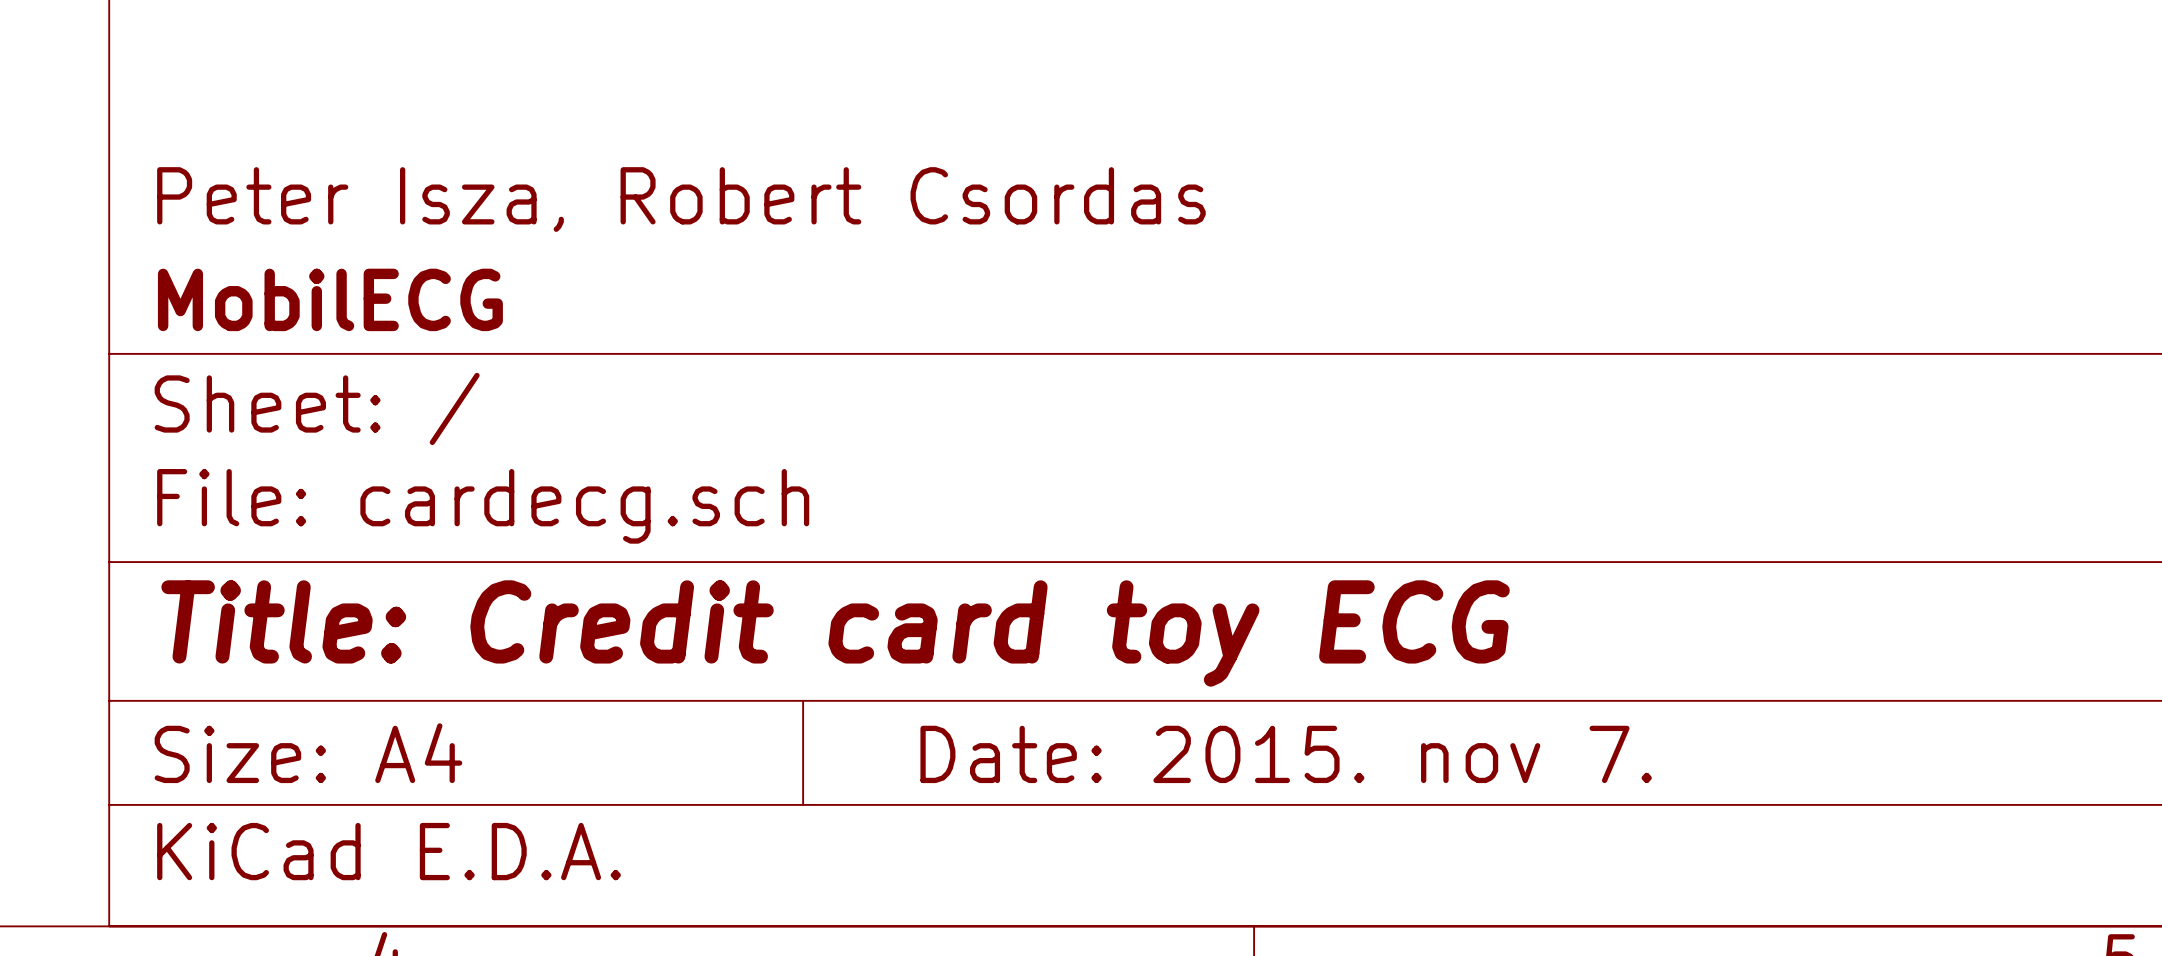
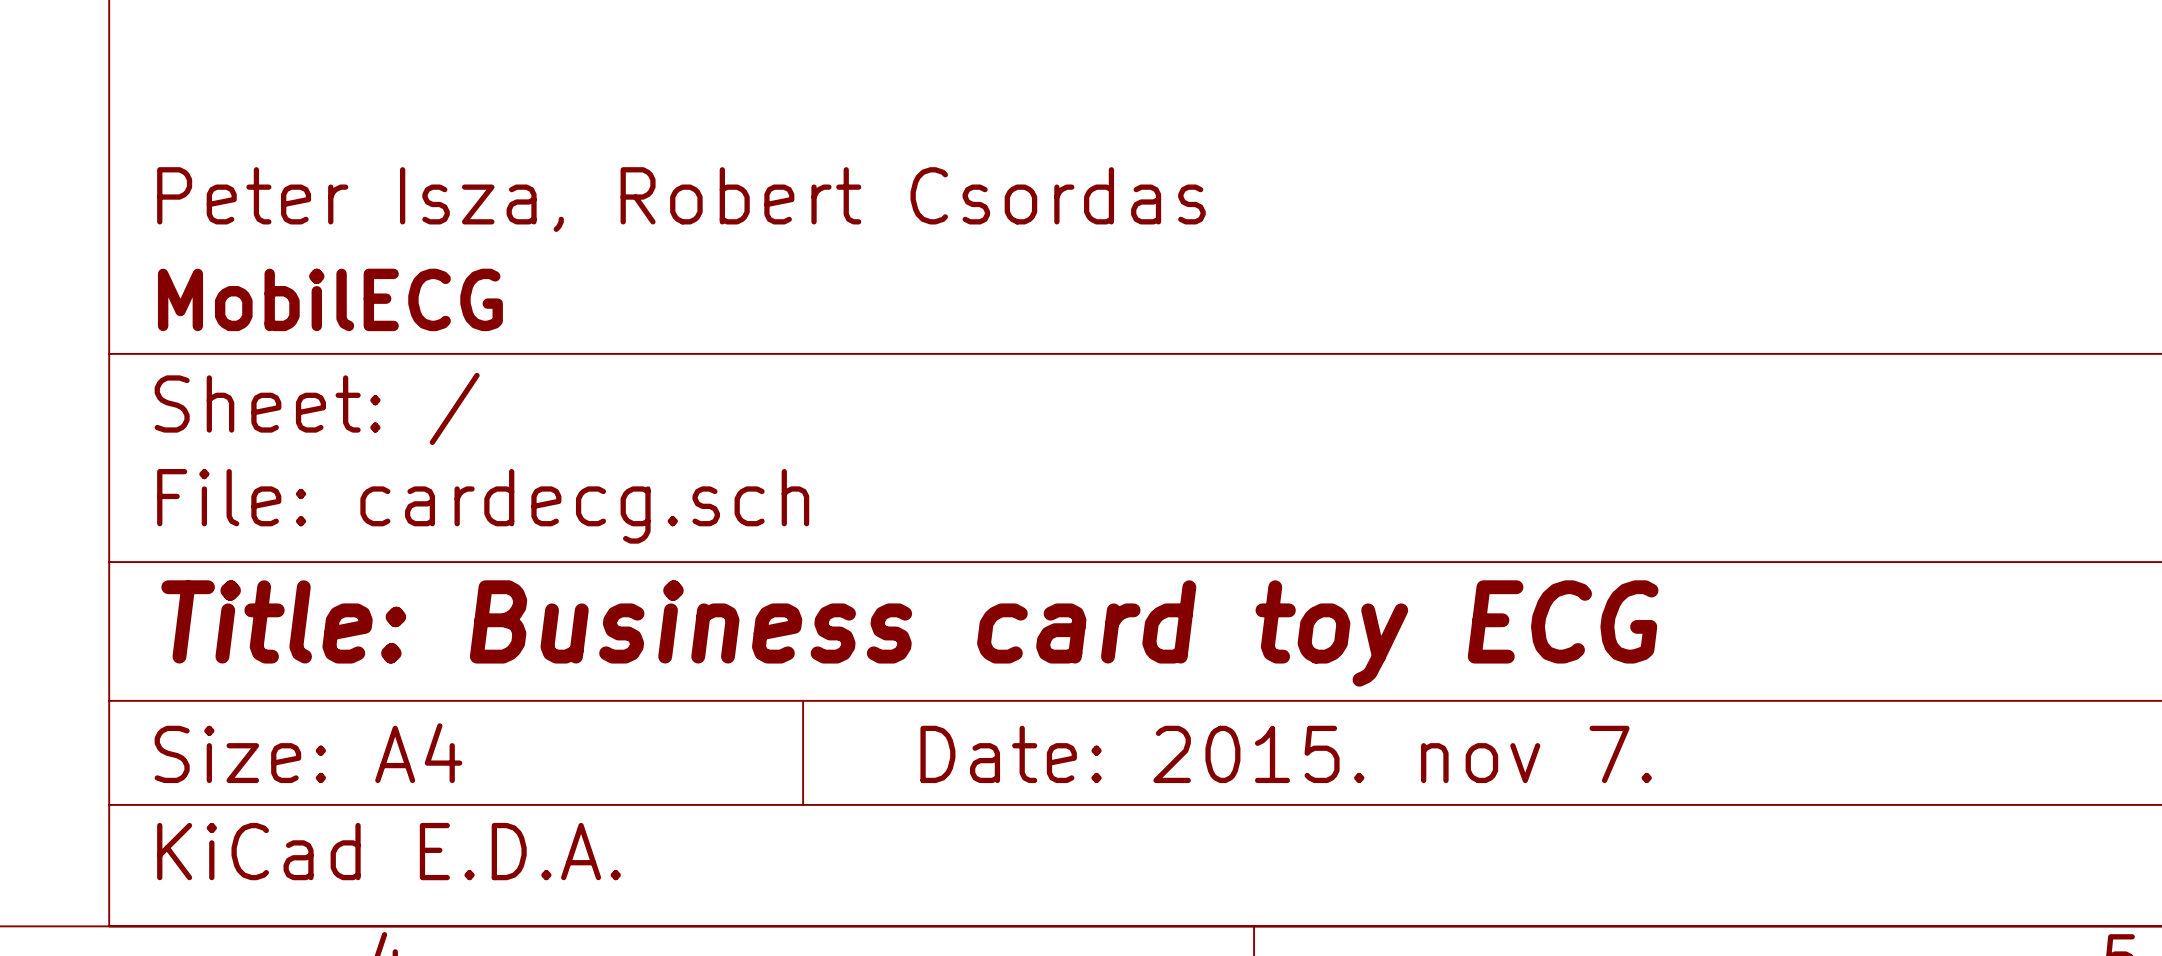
title block: Title: Credit card toy ECG (835, 633) -> Title: Business card toy ECG (909, 633)

